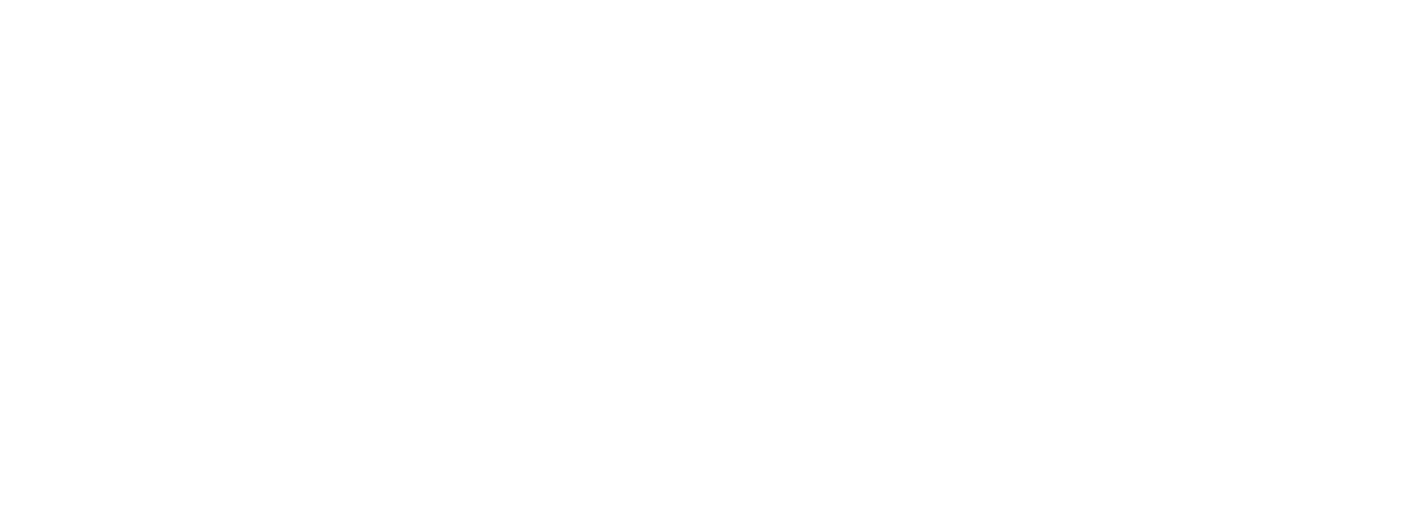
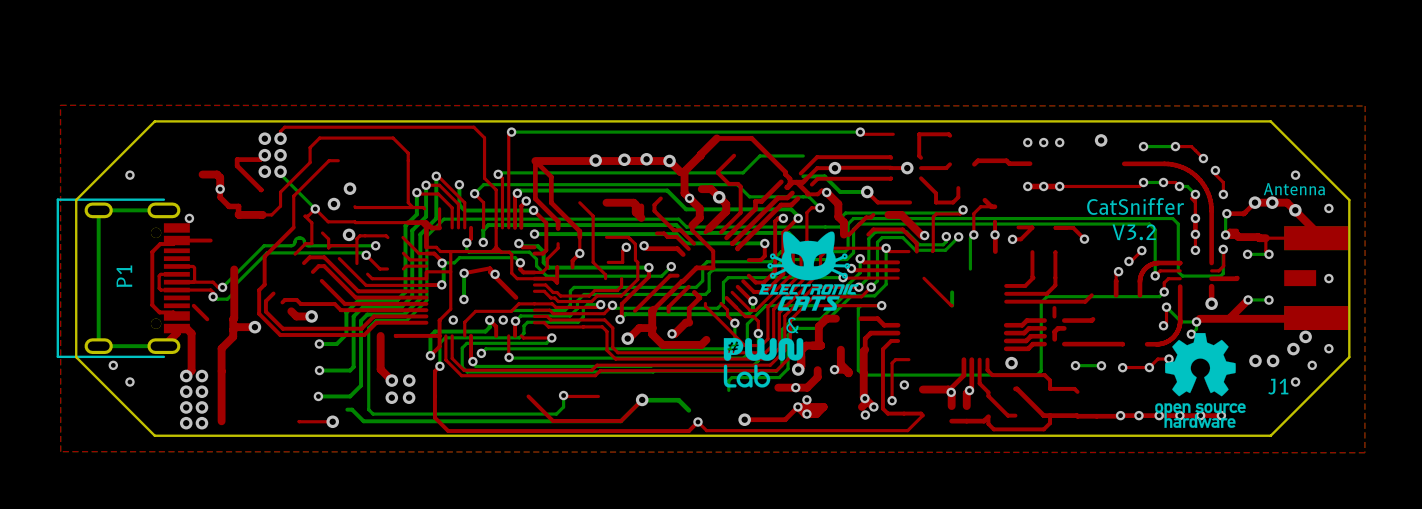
top zone outline: none -> (60, 105) (60, 451) (1364, 452) (1365, 106) (60, 105)
board edge: none -> (154, 121) (76, 199) (76, 357) (154, 435) (1270, 435) (1349, 357) (1349, 199) (1270, 121) (154, 121)
top track: none -> (511, 132) (508, 134) (508, 227)
bottom track: none -> (511, 132) (860, 132)
via: none -> (511, 132)
top track: none -> (860, 132) (862, 134) (893, 134)
via: none -> (860, 132)
top track: none -> (950, 135) (919, 134) (919, 156) (921, 157)
via: none -> (264, 138)
top track: none -> (280, 138) (280, 131) (284, 127) (473, 127) (484, 137) (484, 178) (496, 189) (496, 250)
via: none -> (280, 138)
via: none -> (1101, 140)
via: none -> (1027, 142)
via: none -> (1043, 142)
via: none -> (1059, 142)
bottom track: none -> (1143, 146) (1175, 146)
via: none -> (1143, 146)
top track: none -> (1175, 146) (1191, 146) (1203, 158)
via: none -> (1175, 146)
top track: none -> (264, 155) (260, 159) (237, 159) (237, 165) (261, 189)
via: none -> (264, 155)
via: none -> (280, 155)
top track: none -> (734, 155) (717, 172) (728, 183) (738, 183) (740, 186) (740, 212) (721, 232)
bottom track: none -> (803, 155) (759, 155) (743, 172) (498, 174)
top track: none -> (891, 157) (817, 157) (800, 173)
via: none -> (1203, 158)
via: none -> (624, 159)
via: none -> (646, 159)
top track: none -> (338, 160) (329, 160) (293, 196) (293, 227) (264, 256) (264, 284) (259, 290) (259, 313) (280, 335) (364, 335) (376, 322) (426, 322)
via: none -> (595, 160)
top track: none -> (535, 161) (551, 176) (551, 202) (579, 231) (579, 253) (572, 260) (572, 267)
top track: none -> (535, 161) (535, 198) (558, 221) (558, 228)
top track: none -> (535, 161) (669, 161) (680, 172) (684, 172)
via: none -> (669, 161)
top track: none -> (1030, 163) (1009, 163) (1006, 160) (977, 160) (974, 164)
top track: none -> (1124, 163) (1175, 165) (1189, 170) (1200, 180) (1206, 189) (1211, 203) (1211, 263)
top track: none -> (950, 164) (946, 168) (921, 168)
via: none -> (834, 168)
top track: none -> (907, 168) (817, 168) (803, 182) (793, 182) (786, 187) (790, 184) (790, 178) (785, 172) (751, 138) (716, 138) (684, 171) (684, 193) (699, 208) (699, 217) (692, 225) (692, 230) (713, 251) (713, 267) (696, 267) (650, 312)
via: none -> (907, 168)
top track: none -> (1215, 170) (1215, 174) (1223, 182) (1223, 194)
via: none -> (1215, 170)
via: none -> (264, 171)
bottom track: none -> (280, 171) (280, 174) (315, 208)
via: none -> (280, 171)
top track: none -> (202, 174) (217, 174) (220, 177) (220, 197) (229, 206) (238, 206) (239, 214) (262, 214)
top track: none -> (498, 174) (502, 178) (502, 227)
via: none -> (498, 174)
via: none -> (129, 175)
via: none -> (1295, 175)
top track: none -> (436, 176) (464, 202) (464, 227)
bottom track: none -> (436, 176) (436, 218) (420, 234) (420, 298) (404, 314) (367, 314) (361, 320) (361, 385) (350, 396) (318, 396)
via: none -> (436, 176)
bottom track: none -> (803, 176) (824, 176) (840, 191) (867, 191)
top track: none -> (891, 178) (817, 178) (811, 184)
top track: none -> (921, 178) (936, 193) (936, 202) (953, 202) (958, 197) (958, 188)
top track: none -> (781, 181) (761, 201) (755, 201) (755, 208) (726, 237)
top track: none -> (796, 182) (807, 194) (817, 194) (821, 190) (824, 190) (838, 204) (838, 216) (843, 222) (843, 234) (849, 234) (866, 217) (870, 217) (873, 214)
top track: none -> (1143, 182) (1139, 186) (1027, 186)
bottom track: none -> (1143, 182) (1163, 182)
via: none -> (1143, 182)
top track: none -> (1163, 182) (1175, 182) (1179, 186)
via: none -> (1163, 182)
bottom track: none -> (459, 184) (459, 205) (464, 210) (533, 210)
via: none -> (459, 184)
top track: none -> (426, 185) (439, 185) (458, 204) (458, 227)
bottom track: none -> (426, 185) (426, 216) (412, 230) (412, 296) (401, 307) (362, 307) (353, 316) (353, 367) (350, 370) (319, 370)
via: none -> (426, 185)
via: none -> (1027, 186)
via: none -> (1043, 186)
via: none -> (1059, 186)
bottom track: none -> (1179, 186) (1187, 186) (1195, 194)
via: none -> (1179, 186)
via: none -> (350, 188)
via: none -> (220, 189)
top track: none -> (701, 189) (711, 189) (726, 204) (726, 211) (705, 232)
top track: none -> (867, 191) (877, 202) (910, 202)
via: none -> (867, 191)
top track: none -> (416, 192) (438, 194) (452, 207) (452, 227)
bottom track: none -> (416, 192) (416, 214) (405, 225) (405, 291) (397, 299) (358, 299) (346, 312) (346, 334) (336, 344) (319, 344)
via: none -> (416, 192)
top track: none -> (792, 192) (787, 197) (778, 197) (732, 243)
via: none -> (826, 192)
top track: none -> (474, 193) (483, 202) (483, 227)
bottom track: none -> (474, 193) (483, 184) (737, 184) (749, 196) (808, 196) (819, 207)
via: none -> (474, 193)
top track: none -> (517, 193) (515, 195) (515, 227)
bottom track: none -> (517, 193) (520, 190) (667, 190) (686, 209) (791, 209) (798, 218)
via: none -> (517, 193)
top track: none -> (1195, 194) (1195, 250)
via: none -> (1195, 194)
via: none -> (1223, 194)
via: none -> (719, 197)
top track: none -> (660, 198) (654, 204) (654, 210) (673, 230) (680, 230) (694, 243)
via: none -> (689, 198)
top track: none -> (797, 198) (791, 205) (781, 205) (737, 248)
top track: none -> (1191, 198) (1195, 202)
top track: none -> (984, 200) (991, 206) (994, 206) (980, 206) (973, 213) (973, 234)
top track: none -> (526, 201) (521, 205) (521, 227)
via: none -> (526, 201)
top track: none -> (579, 202) (593, 216) (593, 262) (605, 274) (605, 278)
top track: none -> (606, 202) (633, 202) (635, 204) (635, 212) (641, 217) (641, 206)
via: none -> (1255, 202)
via: none -> (1272, 202)
via: none -> (333, 204)
top track: none -> (354, 206) (424, 208)
text: none -> CatSniffer (1135, 206)
top track: none -> (413, 207) (408, 202) (408, 153) (393, 138) (319, 138) (310, 147) (310, 162) (280, 192) (280, 206) (271, 214) (261, 214)
top track: none -> (819, 207) (811, 207) (806, 212) (806, 241) (801, 246) (801, 273) (767, 306) (767, 338) (761, 345) (744, 345) (705, 306) (705, 303)
via: none -> (819, 207)
via: none -> (315, 208)
top track: none -> (439, 208) (439, 227) (431, 227) (426, 222) (328, 221) (315, 208) (308, 216) (305, 216) (311, 222) (311, 243) (305, 243) (295, 254)
via: none -> (1328, 208)
top track: none -> (963, 209) (960, 213) (936, 213) (933, 216) (932, 251)
bottom track: none -> (963, 209) (959, 213) (845, 213) (842, 216) (842, 224) (840, 227) (825, 227)
via: none -> (963, 209)
bottom track: none -> (163, 210) (98, 210) (98, 346) (163, 346)
top track: none -> (533, 210) (546, 223) (546, 250) (543, 253) (534, 253)
via: none -> (533, 210)
via: none -> (1295, 210)
top track: none -> (1226, 213) (1244, 213)
bottom track: none -> (1226, 213) (1225, 235)
via: none -> (1226, 213)
top track: none -> (888, 214) (901, 214) (921, 235)
top track: none -> (1243, 214) (1255, 202) (1287, 202) (1316, 231) (1316, 238) (1265, 238)
via: none -> (189, 218)
top track: none -> (783, 218) (778, 218) (775, 221) (775, 271) (763, 282) (755, 282) (748, 275)
via: none -> (783, 218)
top track: none -> (798, 218) (783, 232) (783, 273) (765, 291) (753, 291) (743, 281)
via: none -> (798, 218)
via: none -> (1195, 218)
top track: none -> (995, 221) (995, 251)
top track: none -> (421, 222) (426, 227) (426, 247) (436, 247) (440, 251) (500, 251)
top track: none -> (471, 227) (471, 238) (466, 242)
bottom track: none -> (825, 227) (686, 227) (678, 219) (444, 219) (426, 236) (426, 300) (406, 320) (376, 320) (368, 327) (368, 409) (373, 414) (556, 414) (563, 406) (563, 395)
top track: none -> (1018, 227) (1032, 227) (1020, 239) (1012, 239)
top track: none -> (1055, 227) (1073, 227) (1084, 239)
top track: none -> (1236, 230) (1229, 230) (1225, 235) (1265, 238)
drawing: none -> [758, 231, 859, 311]
text: none -> V3.2 (1134, 232)
top track: none -> (322, 233) (328, 239) (328, 247) (330, 245) (355, 245)
top track: none -> (656, 233) (664, 233) (667, 237) (676, 237) (688, 248)
via: none -> (349, 234)
bottom track: none -> (534, 234) (676, 234) (685, 243) (764, 243)
via: none -> (534, 234)
top track: none -> (868, 234) (873, 229) (902, 229) (916, 243) (916, 251)
bottom track: none -> (973, 234) (970, 238) (970, 269)
via: none -> (973, 234)
via: none -> (995, 234)
via: none -> (1195, 234)
via: none -> (924, 235)
via: none -> (1225, 235)
bottom track: none -> (946, 236) (946, 241) (943, 244) (919, 244) (906, 232) (875, 232) (868, 238) (868, 277) (858, 287)
via: none -> (946, 236)
bottom track: none -> (958, 236) (945, 250) (915, 250) (902, 237) (882, 237) (877, 242) (877, 280) (871, 287)
via: none -> (958, 236)
top track: none -> (387, 237) (386, 235) (359, 235) (356, 238) (356, 263)
top track: none -> (402, 237) (419, 253) (434, 253) (442, 263)
top track: none -> (606, 237) (629, 238)
top track: none -> (793, 237) (793, 272) (755, 310) (750, 310) (732, 292)
bottom track: none -> (793, 237) (788, 232) (684, 232) (676, 225) (488, 225) (483, 230) (483, 242)
top track: none -> (629, 238) (635, 244) (637, 279) (621, 296) (597, 296) (591, 301) (558, 301) (544, 291) (534, 291)
top track: none -> (1265, 238) (1265, 251) (1269, 254)
via: none -> (1012, 239)
via: none -> (1084, 239)
top track: none -> (210, 240) (176, 240) (173, 244) (160, 244) (152, 252) (152, 305) (159, 312) (173, 312) (176, 315)
bottom track: none -> (466, 242) (466, 250) (468, 252) (529, 252) (536, 259) (536, 266) (546, 276) (661, 276) (671, 266)
via: none -> (466, 242)
via: none -> (483, 242)
top track: none -> (518, 243) (522, 247) (534, 247)
bottom track: none -> (518, 243) (521, 246) (538, 246) (543, 251) (543, 262) (548, 267) (648, 267)
via: none -> (518, 243)
top track: none -> (558, 243) (558, 248) (547, 259) (547, 267) (542, 272) (523, 272) (520, 269) (520, 262)
top track: none -> (764, 243) (764, 256) (760, 260) (748, 260)
via: none -> (764, 243)
bottom track: none -> (375, 245) (307, 245) (300, 238) (296, 238) (291, 245) (264, 245) (222, 287)
via: none -> (375, 245)
top track: none -> (644, 245) (647, 248) (677, 248) (683, 254)
via: none -> (644, 245)
top track: none -> (626, 247) (622, 250) (622, 262) (608, 262)
via: none -> (626, 247)
bottom track: none -> (886, 248) (886, 284) (874, 295) (851, 295) (819, 328) (794, 328) (788, 335) (788, 368) (779, 377) (731, 377) (728, 380) (728, 390)
via: none -> (886, 248)
top track: none -> (1223, 249) (1223, 265) (1218, 270) (1211, 270)
bottom track: none -> (1223, 249) (1223, 273) (1220, 276) (1182, 276) (1178, 271) (1178, 224) (1172, 218) (853, 218) (848, 224) (848, 248) (845, 251) (781, 251) (771, 261) (707, 261) (702, 266) (702, 280) (696, 287) (574, 287) (570, 291) (570, 305) (565, 310) (513, 310)
via: none -> (1223, 249)
top track: none -> (1141, 250) (1128, 261)
via: none -> (1141, 250)
via: none -> (1195, 250)
top track: none -> (450, 251) (450, 309) (440, 319)
top track: none -> (491, 251) (496, 247) (501, 252) (509, 252) (511, 254) (511, 273) (517, 278) (553, 278) (557, 282) (557, 267)
top track: none -> (908, 251) (889, 251) (886, 248) (829, 248) (820, 256) (820, 271) (779, 312) (779, 348) (768, 359) (615, 359) (606, 350) (606, 331) (602, 326) (548, 326) (544, 322) (534, 322)
top track: none -> (1032, 252) (1033, 277) (1025, 285) (1006, 285)
top track: none -> (1055, 252) (1055, 285) (1046, 293) (1006, 293)
top track: none -> (403, 253) (410, 259) (426, 259)
via: none -> (579, 253)
bottom track: none -> (1247, 254) (1269, 254)
via: none -> (1247, 254)
via: none -> (1269, 254)
top track: none -> (366, 255) (380, 268) (387, 268)
bottom track: none -> (366, 255) (363, 252) (267, 252) (234, 285) (234, 292) (227, 299) (217, 299) (213, 296)
via: none -> (366, 255)
top track: none -> (339, 258) (366, 285) (441, 285)
top track: none -> (860, 258) (863, 262) (898, 262)
bottom track: none -> (860, 258) (860, 272) (846, 286) (846, 293) (820, 319) (792, 319) (781, 329) (781, 365) (776, 371) (467, 371) (462, 366) (462, 348) (466, 343) (546, 343) (551, 337)
via: none -> (860, 258)
via: none -> (1128, 261)
bottom track: none -> (520, 262) (515, 257) (459, 257) (454, 262) (442, 263) (443, 282) (441, 284)
via: none -> (520, 262)
top track: none -> (303, 263) (309, 257) (324, 257) (358, 291) (426, 291)
via: none -> (442, 263)
top track: none -> (1179, 263) (1156, 263) (1146, 267) (1140, 277) (1139, 295)
top track: none -> (176, 266) (193, 266) (194, 268) (193, 282)
top track: none -> (426, 266) (406, 266) (403, 268)
via: none -> (671, 266)
top track: none -> (648, 267) (648, 276) (621, 304) (621, 317) (620, 319)
via: none -> (648, 267)
top track: none -> (811, 268) (811, 271) (773, 309) (773, 344) (765, 352) (617, 352) (612, 347) (612, 328) (604, 319) (550, 319) (547, 316) (534, 316)
top track: none -> (851, 268) (853, 270) (898, 270)
via: none -> (851, 268)
top track: none -> (234, 269) (233, 336) (221, 348) (221, 421)
top track: none -> (1180, 270) (1160, 270) (1155, 275)
top track: none -> (312, 271) (318, 266) (324, 266) (355, 297) (426, 297)
top track: none -> (450, 271) (427, 271) (426, 278) (372, 278) (367, 274)
top track: none -> (1118, 271) (1116, 274) (1116, 295) (1116, 281)
via: none -> (1118, 271)
top track: none -> (464, 273) (490, 268) (495, 274) (490, 271) (515, 297)
bottom track: none -> (464, 273) (463, 299)
via: none -> (464, 273)
top track: none -> (176, 274) (160, 274) (159, 288) (160, 290) (210, 290) (213, 296)
via: none -> (495, 274)
top track: none -> (677, 275) (670, 275) (634, 310)
bottom track: none -> (1155, 275) (1155, 229) (1149, 224) (858, 224) (853, 229) (853, 252) (846, 259) (783, 259) (772, 269) (712, 269) (709, 273) (709, 290) (705, 294) (584, 294) (577, 301) (577, 308) (570, 315) (520, 315) (515, 321)
via: none -> (1155, 275)
top track: none -> (843, 277) (898, 278)
bottom track: none -> (843, 277) (728, 277) (723, 282) (723, 302) (717, 308) (615, 308) (612, 305)
via: none -> (843, 277)
P1: none -> (123, 278)
top track: none -> (621, 278) (621, 286) (617, 290) (594, 290) (589, 296) (560, 296) (557, 292) (553, 292) (545, 285) (534, 285)
top track: none -> (923, 278) (952, 305)
top track: none -> (1180, 278) (1168, 278) (1164, 282) (1164, 291)
top track: none -> (1237, 278) (1211, 278)
J1: none -> Antenna (1316, 278)
via: none -> (1328, 278)
top track: none -> (321, 280) (344, 303) (426, 303)
top track: none -> (176, 282) (212, 282) (218, 287) (222, 287)
via: none -> (441, 284)
top track: none -> (688, 286) (668, 306) (668, 311)
top track: none -> (737, 286) (752, 300)
top track: none -> (1180, 286) (1180, 321) (1176, 332) (1164, 342) (1147, 344)
top track: none -> (1211, 286) (1211, 303)
via: none -> (222, 287)
top track: none -> (858, 287) (813, 287) (784, 316) (784, 350) (770, 365) (597, 365) (592, 370) (463, 370) (452, 358) (452, 335)
via: none -> (858, 287)
top track: none -> (871, 287) (861, 296) (813, 296) (790, 320) (790, 356) (776, 370) (600, 370) (595, 375) (461, 375) (445, 359) (445, 335)
via: none -> (871, 287)
bottom track: none -> (1164, 291) (1159, 296) (1047, 296) (1041, 302) (1041, 370) (1037, 375) (863, 375) (858, 370) (858, 308) (860, 305) (881, 305)
via: none -> (1164, 291)
top track: none -> (694, 292) (699, 297) (689, 308) (689, 322) (686, 322) (674, 333) (672, 333)
bottom track: none -> (952, 292) (952, 305)
top track: none -> (273, 293) (265, 301) (265, 311) (282, 328) (361, 328) (373, 316) (426, 316)
top track: none -> (1091, 295) (1085, 301) (1006, 301)
via: none -> (213, 296)
top track: none -> (726, 297) (745, 316) (753, 316) (758, 321) (758, 333)
via: none -> (463, 299)
top track: none -> (1248, 299) (1230, 318)
bottom track: none -> (1248, 299) (1268, 299)
via: none -> (1248, 299)
bottom track: none -> (752, 300) (752, 309) (748, 314) (625, 314) (620, 319)
via: none -> (752, 300)
via: none -> (1269, 300)
top track: none -> (282, 302) (284, 299) (296, 299) (300, 304) (334, 304) (340, 310) (426, 310)
top track: none -> (721, 303) (727, 309) (727, 315) (734, 323)
via: none -> (1211, 303)
top track: none -> (600, 304) (597, 307) (555, 307) (552, 303) (518, 303) (511, 311) (475, 311) (464, 322) (464, 335)
bottom track: none -> (600, 304) (587, 304) (583, 308) (583, 317) (578, 322) (527, 322) (524, 325) (524, 333) (519, 337) (445, 337) (439, 343) (439, 366)
via: none -> (600, 304)
top track: none -> (193, 305) (207, 319)
top track: none -> (612, 305) (604, 313) (553, 313) (549, 310) (534, 310)
via: none -> (612, 305)
top track: none -> (817, 305) (881, 305)
bottom track: none -> (817, 305) (765, 305) (747, 324) (747, 354) (743, 358) (509, 357)
via: none -> (881, 305)
top track: none -> (1054, 307) (1054, 316)
top track: none -> (1166, 307) (1166, 322) (1163, 325)
bottom track: none -> (1166, 307) (1181, 321) (1196, 321) (1196, 329) (1191, 334)
via: none -> (1166, 307)
top track: none -> (653, 309) (652, 334) (662, 344) (701, 344) (706, 339)
top track: none -> (291, 311) (296, 316) (311, 316)
via: none -> (311, 316)
top track: none -> (835, 318) (826, 318) (818, 326) (818, 343) (821, 345) (806, 345) (801, 350) (801, 366) (798, 369)
top track: none -> (860, 318) (877, 318) (884, 325) (898, 325)
top track: none -> (1290, 318) (1199, 318) (1196, 321)
top track: none -> (440, 319) (439, 346) (430, 355)
via: none -> (620, 319)
top track: none -> (1093, 319) (1064, 320)
via: none -> (453, 320)
top track: none -> (489, 320) (496, 326) (496, 335)
bottom track: none -> (489, 320) (489, 327) (485, 331) (435, 331) (430, 336) (430, 355)
via: none -> (489, 320)
via: none -> (503, 320)
top track: none -> (1044, 320) (1026, 320) (1022, 325) (1006, 325)
top track: none -> (515, 321) (515, 335)
via: none -> (515, 321)
via: none -> (1196, 321)
bottom track: none -> (734, 323) (734, 344) (730, 348) (485, 348) (481, 353)
via: none -> (734, 323)
text: none -> & (792, 325)
via: none -> (1163, 325)
top track: none -> (254, 327) (236, 327) (233, 329)
via: none -> (254, 327)
top track: none -> (652, 328) (639, 328) (627, 338)
top track: none -> (1044, 328) (1028, 328) (1024, 333) (1006, 333)
top track: none -> (1064, 328) (1058, 328) (1054, 331) (1054, 339)
via: none -> (672, 333)
bottom track: none -> (758, 333) (758, 360) (753, 365) (475, 366) (472, 361)
via: none -> (758, 333)
top track: none -> (898, 333) (870, 333) (865, 338) (863, 397) (873, 406)
drawing: none -> [1155, 333, 1246, 428]
via: none -> (1191, 334)
top track: none -> (380, 335) (380, 369) (391, 380)
top track: none -> (395, 335) (439, 335)
top track: none -> (471, 335) (471, 359) (472, 361)
top track: none -> (508, 335) (509, 357)
top track: none -> (521, 335) (523, 337) (551, 337)
top track: none -> (1044, 336) (1030, 336) (1026, 340) (1006, 340)
via: none -> (1305, 336)
via: none -> (551, 337)
via: none -> (627, 338)
drawing: none -> [723, 338, 804, 388]
top track: none -> (898, 340) (891, 340) (882, 349) (882, 408) (887, 413) (921, 413) (922, 415) (907, 430) (706, 430) (697, 421) (688, 431) (448, 431) (434, 417) (434, 371) (439, 366)
via: none -> (319, 344)
top track: none -> (1044, 344) (1032, 344) (1028, 348) (1006, 348)
top track: none -> (1064, 344) (1122, 344)
top track: none -> (163, 346) (176, 333) (176, 328) (186, 328) (191, 333) (191, 370) (186, 376)
via: none -> (1328, 348)
top track: none -> (840, 349) (840, 364) (848, 373) (845, 369) (834, 369)
via: none -> (1293, 349)
via: none -> (481, 353)
via: none -> (430, 355)
via: none -> (509, 357)
top track: none -> (908, 359) (895, 359) (892, 363) (892, 400)
top track: none -> (963, 359) (963, 375) (951, 388) (951, 392)
top track: none -> (971, 359) (971, 388) (966, 393) (966, 406)
top track: none -> (979, 359) (979, 383) (988, 392) (988, 396) (1007, 415) (1015, 415)
top track: none -> (987, 359) (987, 370) (992, 375) (1044, 375) (1050, 380) (1050, 388) (1074, 388) (1077, 391)
top track: none -> (1169, 359) (1157, 359) (1149, 367) (1122, 367)
via: none -> (1169, 359)
via: none -> (1255, 360)
via: none -> (1273, 360)
via: none -> (472, 361)
via: none -> (1011, 363)
via: none -> (113, 365)
bottom track: none -> (1075, 365) (1101, 365)
via: none -> (1075, 365)
via: none -> (1101, 365)
via: none -> (1312, 365)
via: none -> (439, 366)
via: none -> (1122, 367)
via: none -> (1149, 367)
via: none -> (798, 369)
via: none -> (834, 369)
via: none -> (319, 370)
top track: none -> (817, 370) (817, 377) (807, 387) (778, 387)
via: none -> (186, 376)
via: none -> (201, 376)
via: none -> (391, 380)
via: none -> (409, 380)
via: none -> (129, 382)
via: none -> (1295, 382)
via: none -> (904, 384)
via: none -> (795, 387)
top track: none -> (1015, 388) (1043, 415) (1221, 415)
top track: none -> (922, 389) (948, 389) (951, 392) (951, 406)
via: none -> (969, 390)
via: none -> (186, 391)
via: none -> (201, 391)
via: none -> (951, 392)
top track: none -> (563, 395) (598, 396)
via: none -> (563, 395)
via: none -> (318, 396)
top track: none -> (528, 396) (553, 420) (621, 420) (642, 399)
via: none -> (391, 397)
via: none -> (409, 397)
via: none -> (864, 398)
via: none -> (642, 399)
via: none -> (806, 399)
via: none -> (892, 400)
top track: none -> (864, 404) (861, 406)
top track: none -> (797, 406) (785, 419) (744, 419)
top track: none -> (797, 406) (823, 406) (816, 414) (805, 414) (797, 406)
via: none -> (797, 406)
via: none -> (873, 406)
via: none -> (186, 407)
via: none -> (201, 407)
bottom track: none -> (347, 409) (352, 409) (363, 421) (620, 421) (642, 399) (678, 400) (688, 410)
via: none -> (806, 414)
via: none -> (865, 415)
top track: none -> (1050, 415) (1050, 423) (1043, 429) (993, 429) (988, 423) (988, 416) (984, 421) (951, 421)
via: none -> (1120, 415)
via: none -> (1138, 415)
via: none -> (1159, 415)
via: none -> (1179, 415)
via: none -> (1200, 415)
via: none -> (1221, 415)
via: none -> (744, 419)
top track: none -> (298, 421) (332, 421)
via: none -> (332, 421)
via: none -> (697, 421)
via: none -> (186, 423)
via: none -> (201, 423)

